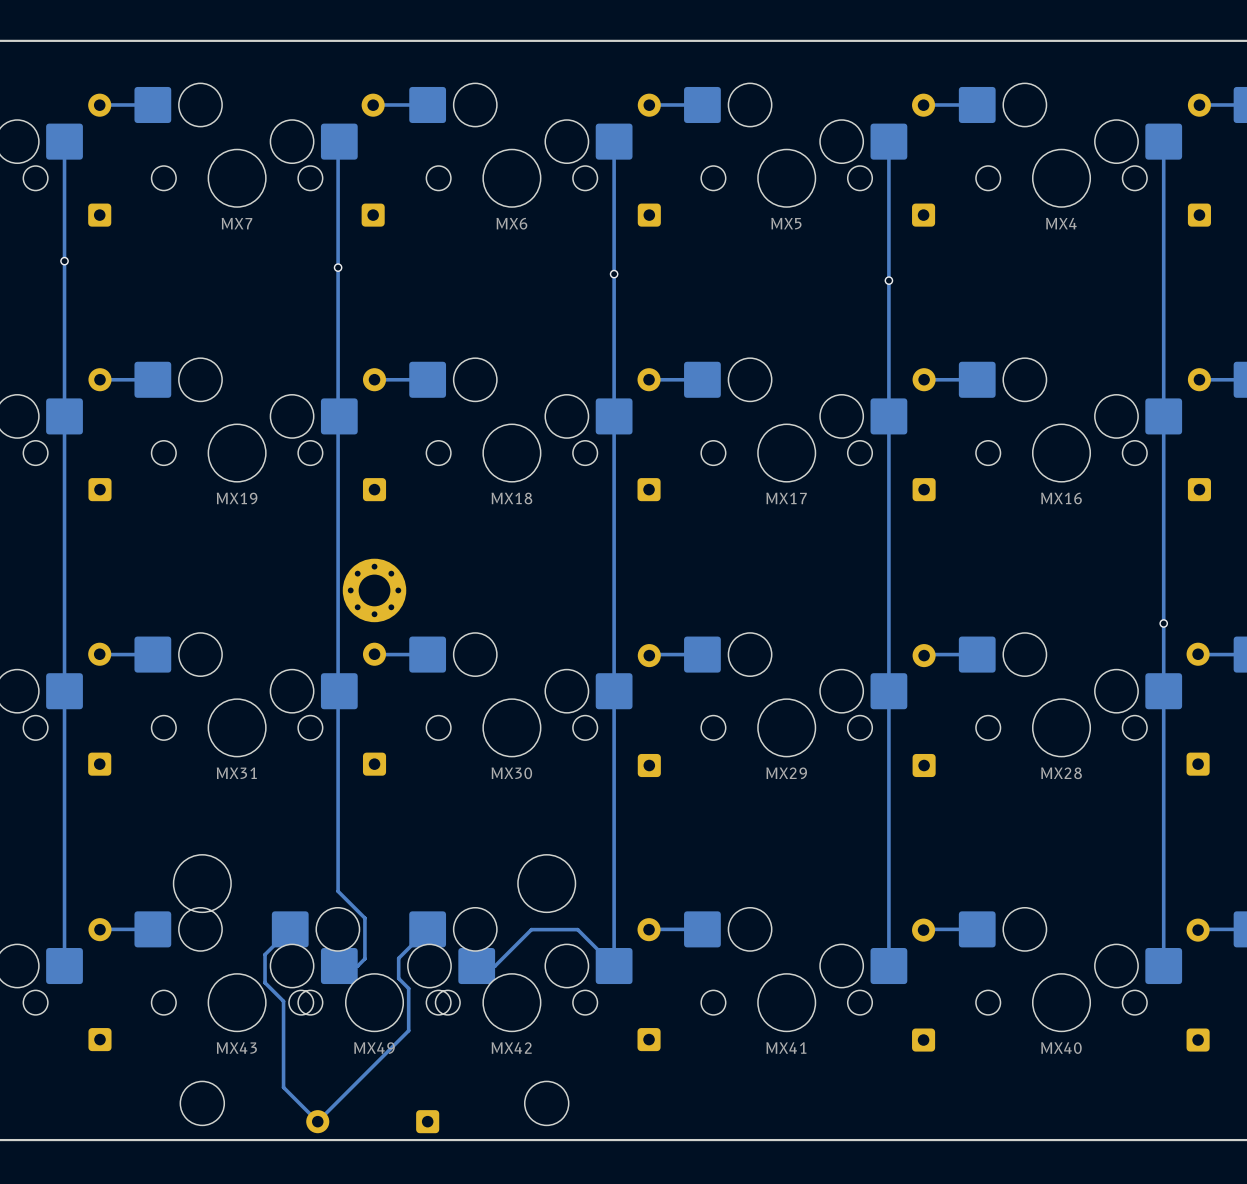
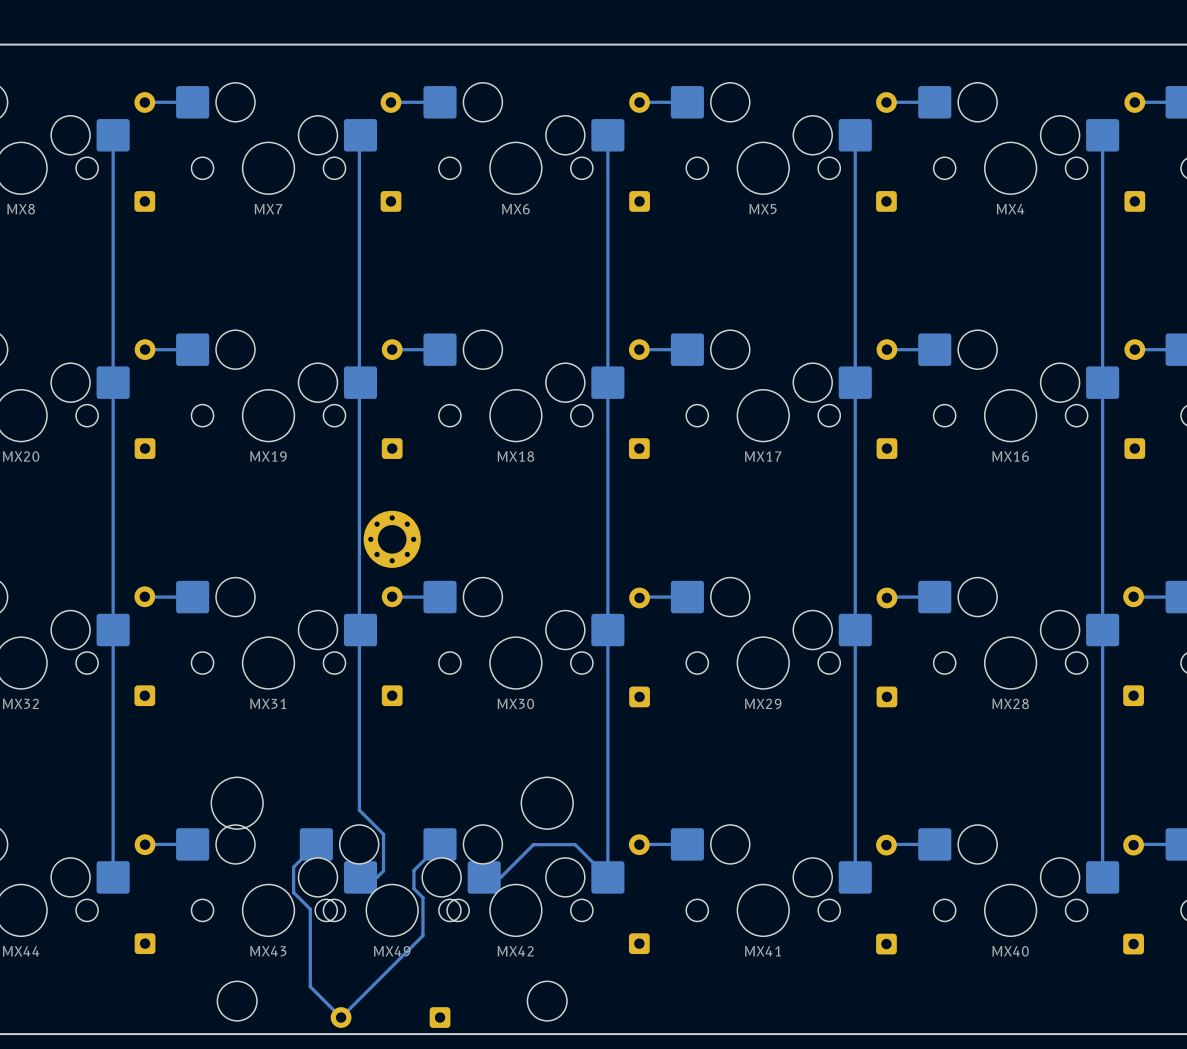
via: (64, 261) -> none
via: (338, 267) -> none
via: (614, 274) -> none
via: (888, 280) -> none
via: (1163, 623) -> none

